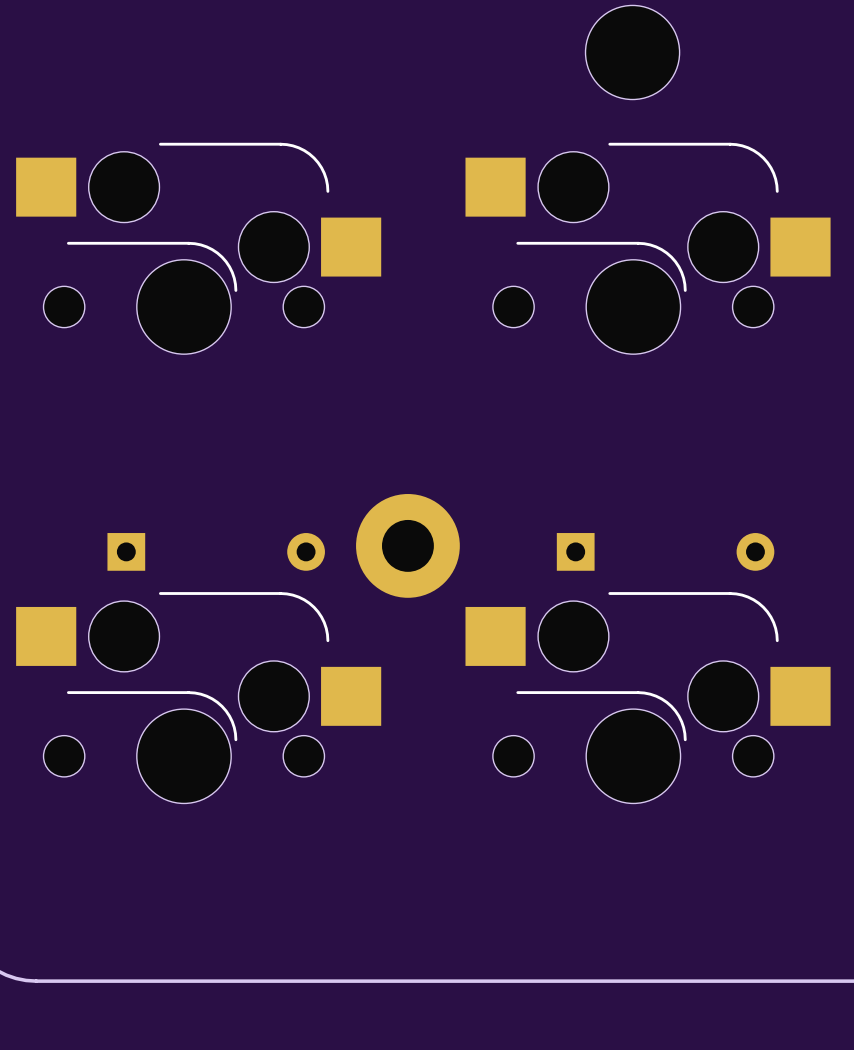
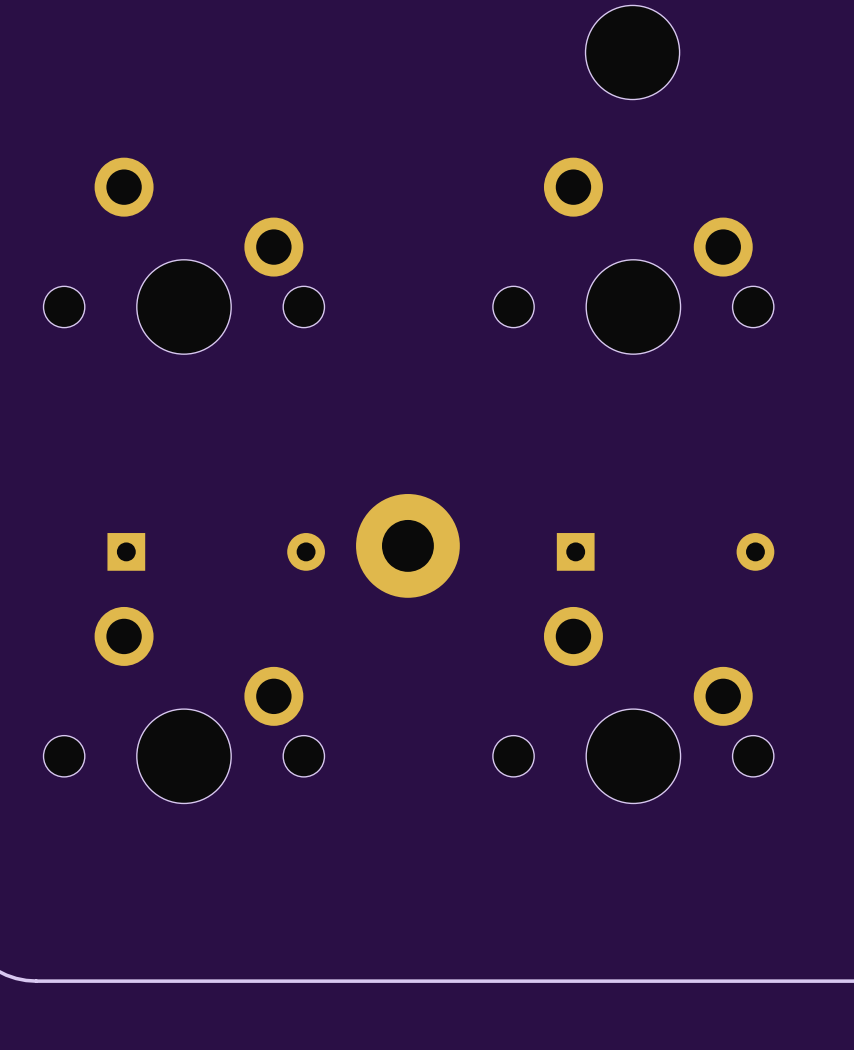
part footprint: [16, 142, 382, 355] -> [43, 157, 325, 355]
part footprint: [465, 142, 831, 355] -> [492, 157, 774, 355]
part footprint: [16, 592, 382, 804] -> [43, 606, 325, 804]
part footprint: [465, 592, 831, 804] -> [492, 606, 774, 804]

